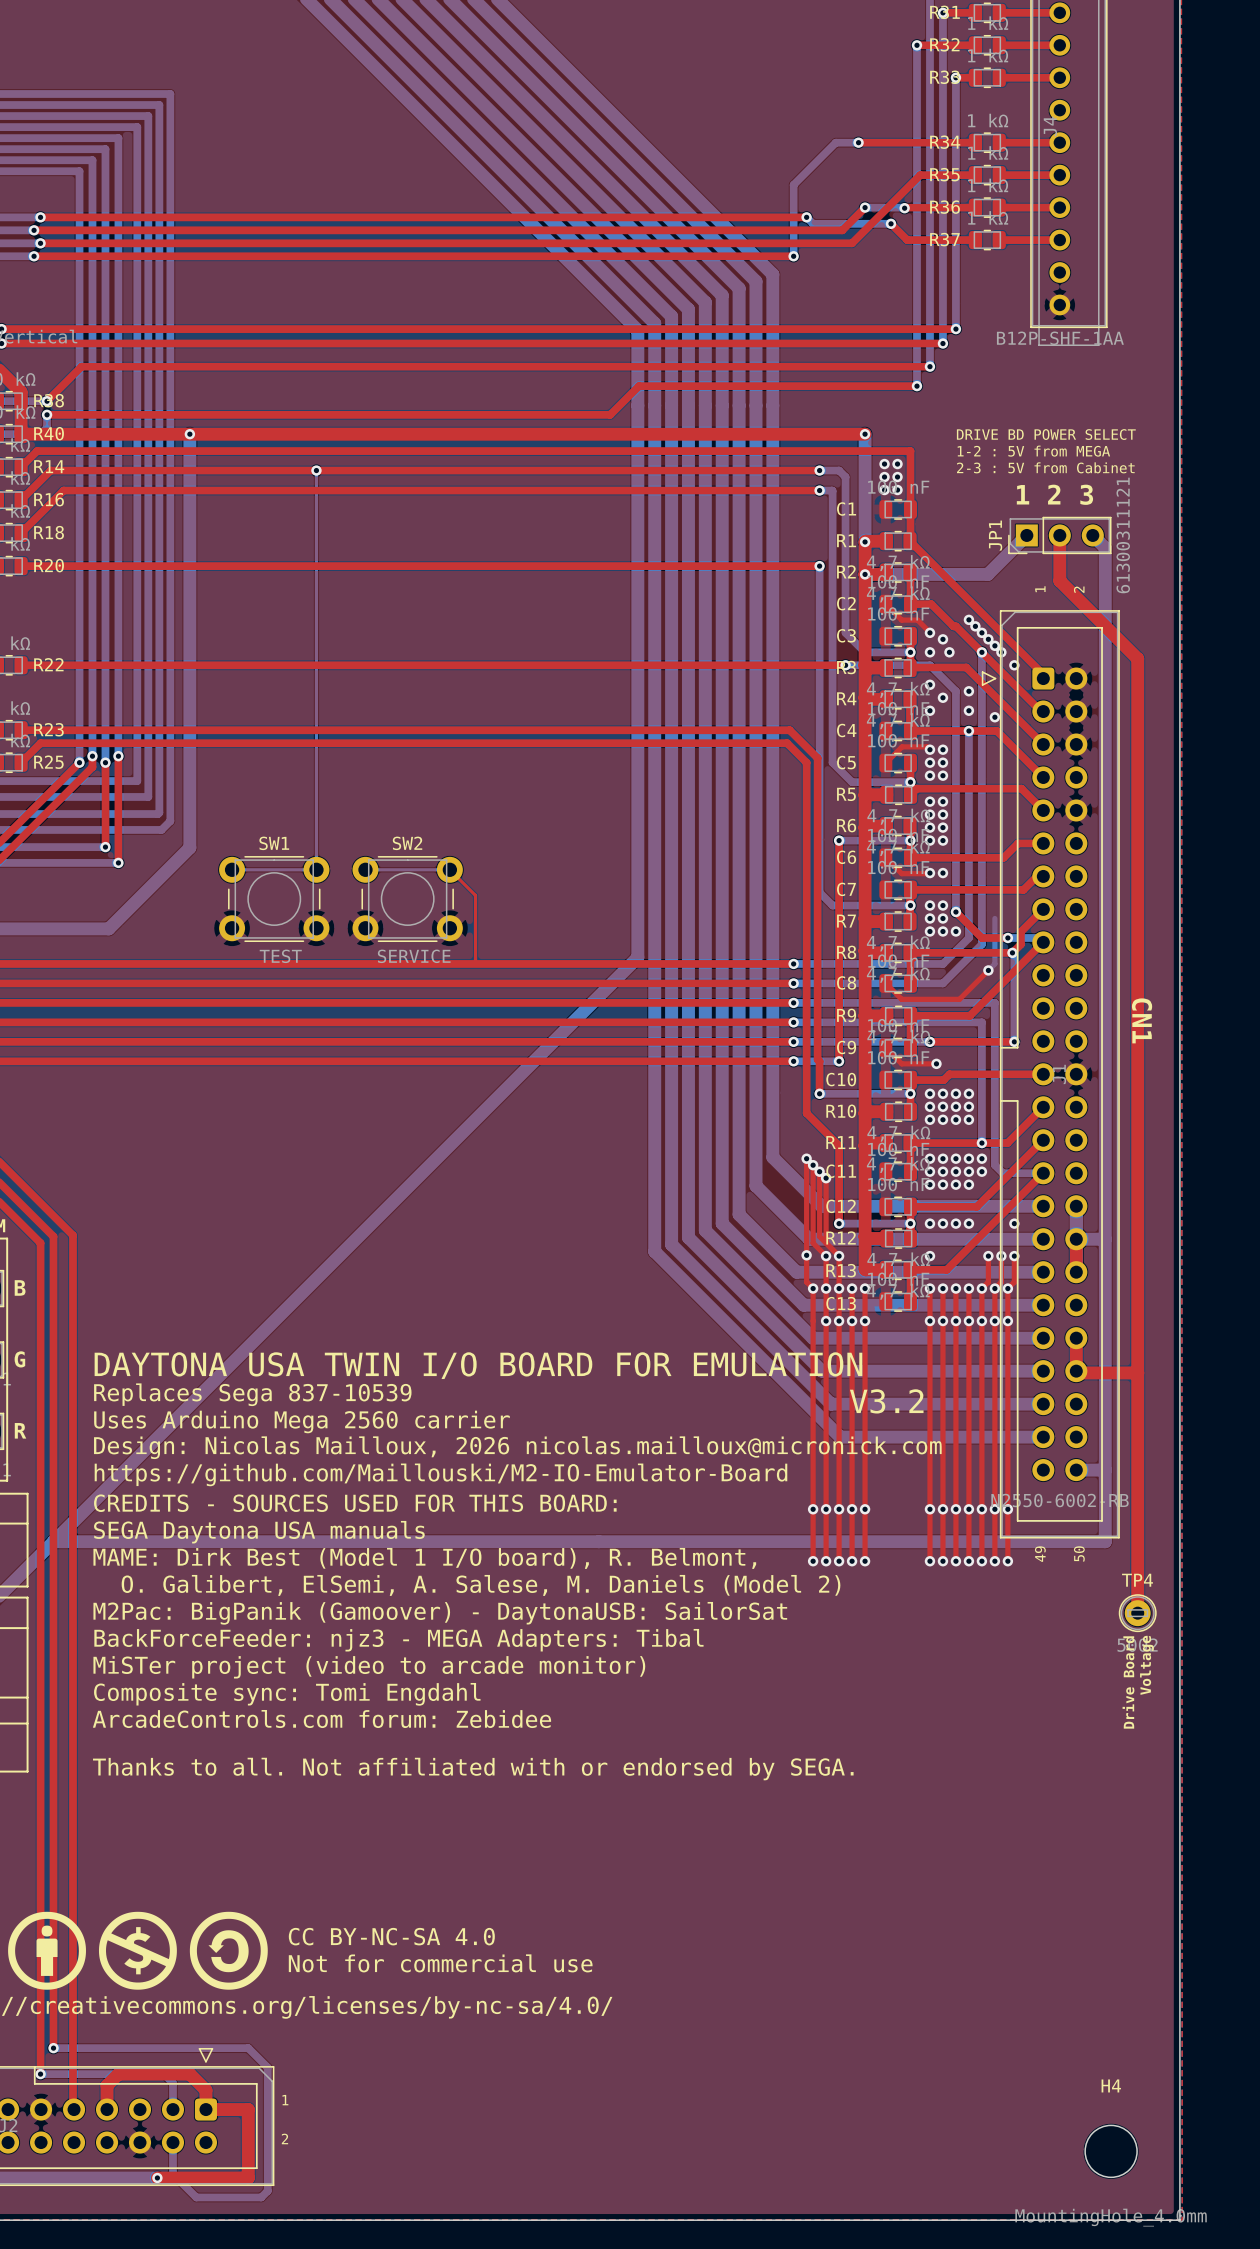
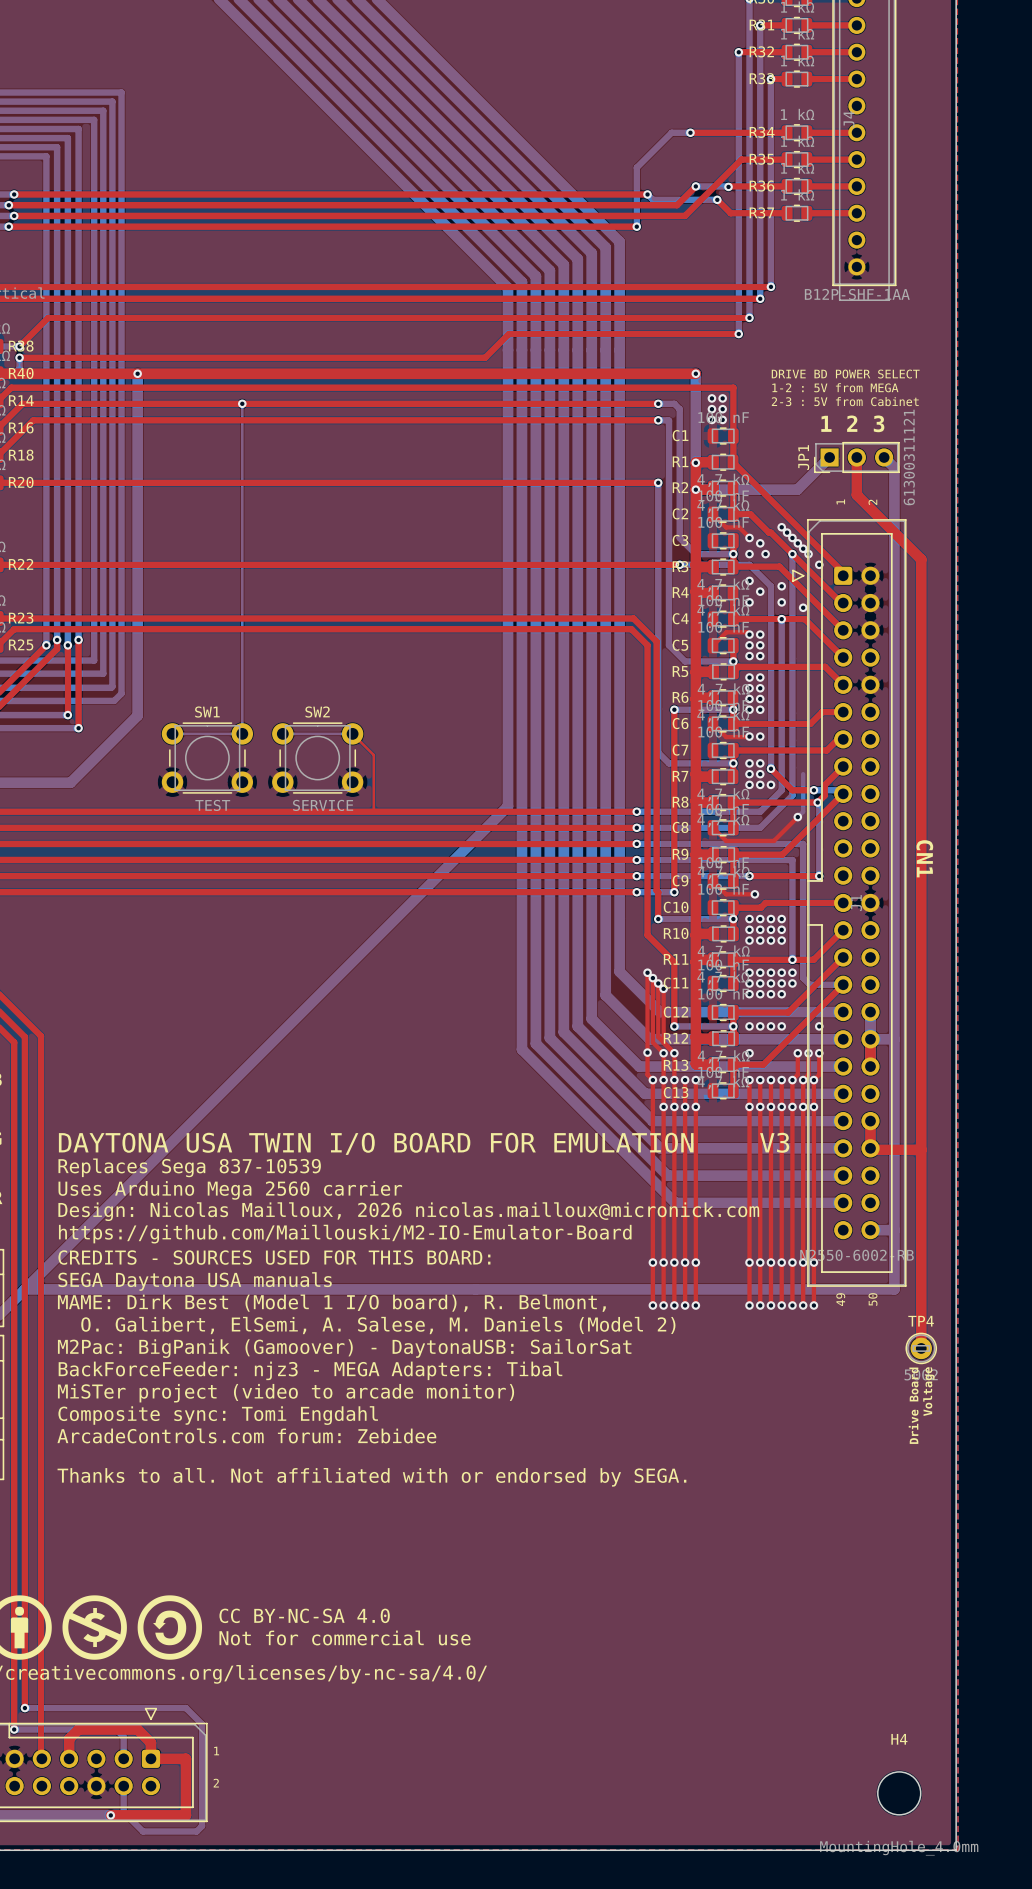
text: none -> V3 (774, 1142)
text: V3.2 (886, 1401) -> none

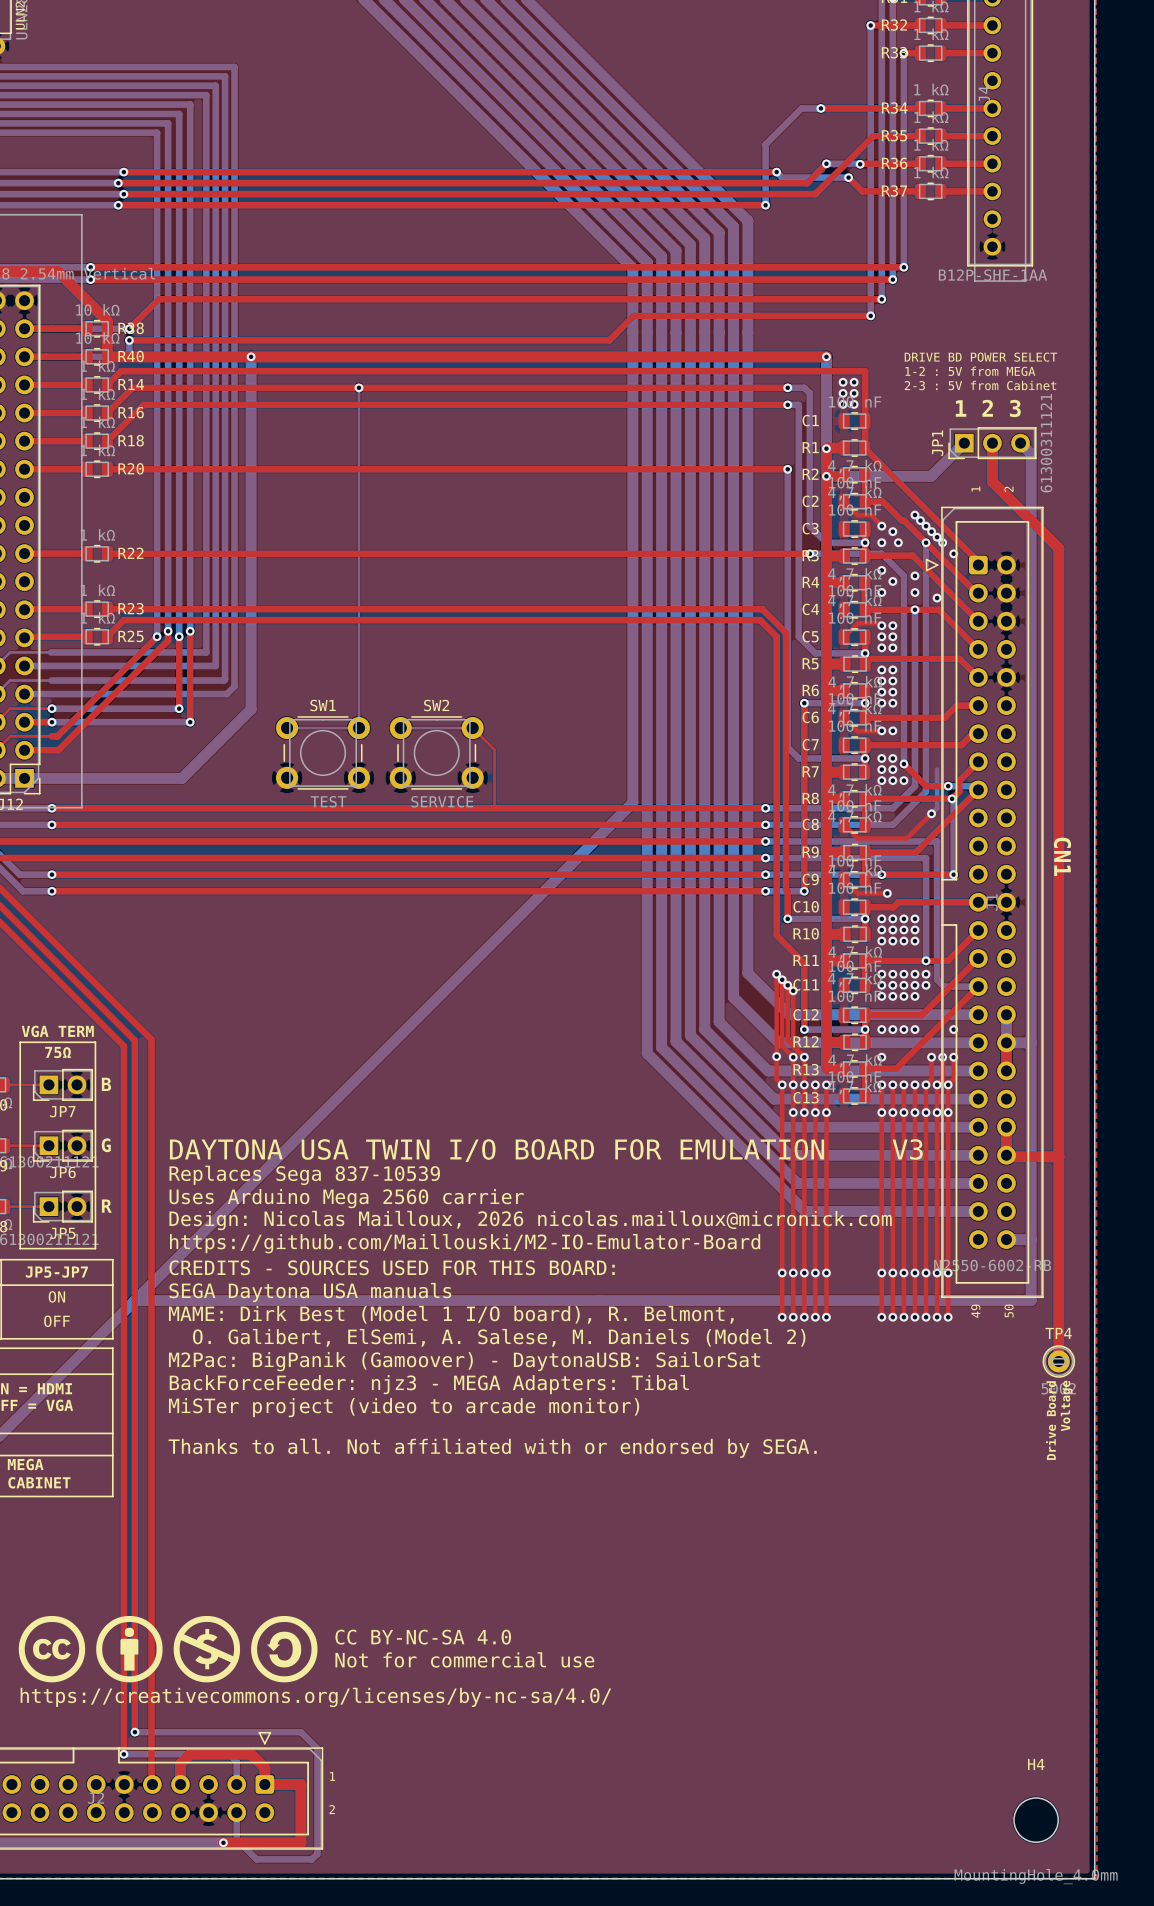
text: Composite sync: Tomi Engdahl (218, 1415) -> none
text: ArcadeControls.com forum: Zebidee (246, 1435) -> Thanks to all. Not affiliated with or endorsed by SEGA. (492, 1448)
text: Thanks to all. Not affiliated with or endorsed by SEGA. (371, 1477) -> none

